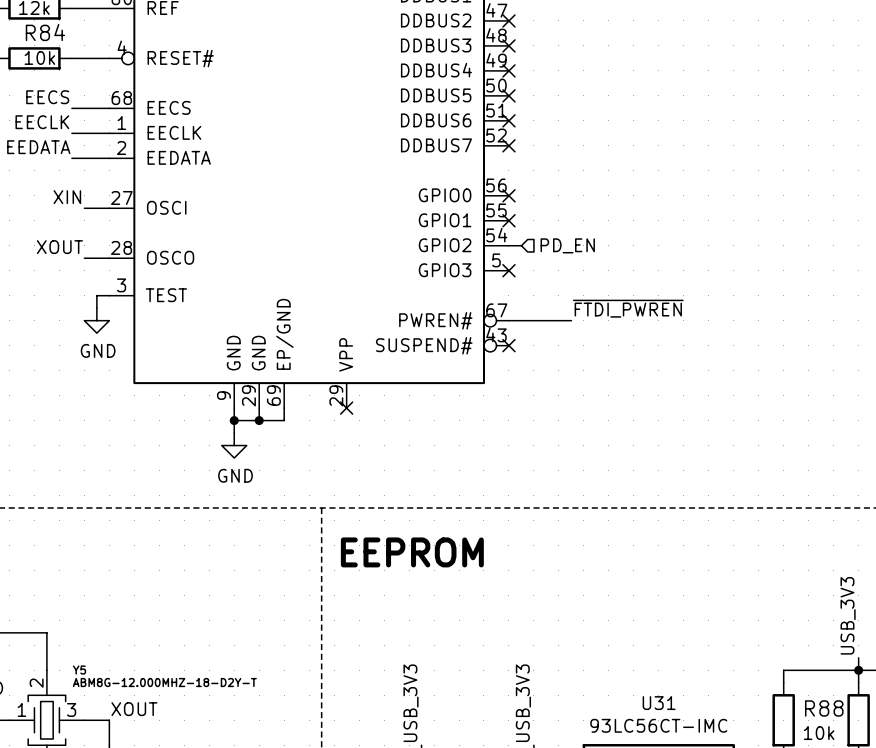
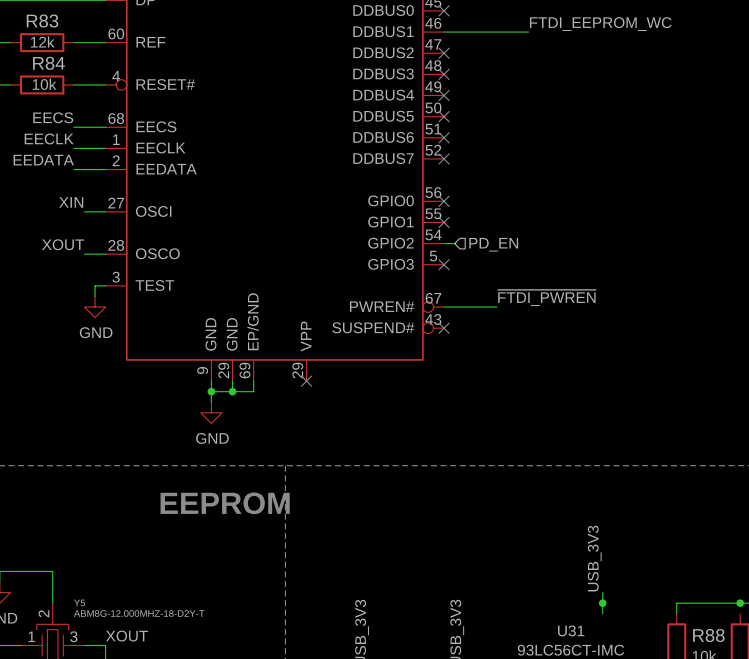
text position: EEPROM (412, 552) -> EEPROM (225, 503)
label position: USB_3V3 (848, 615) -> USB_3V3 (594, 558)
wire: (858, 657) (858, 682) -> (602, 592) (602, 613)
junction: none -> (602, 603)

